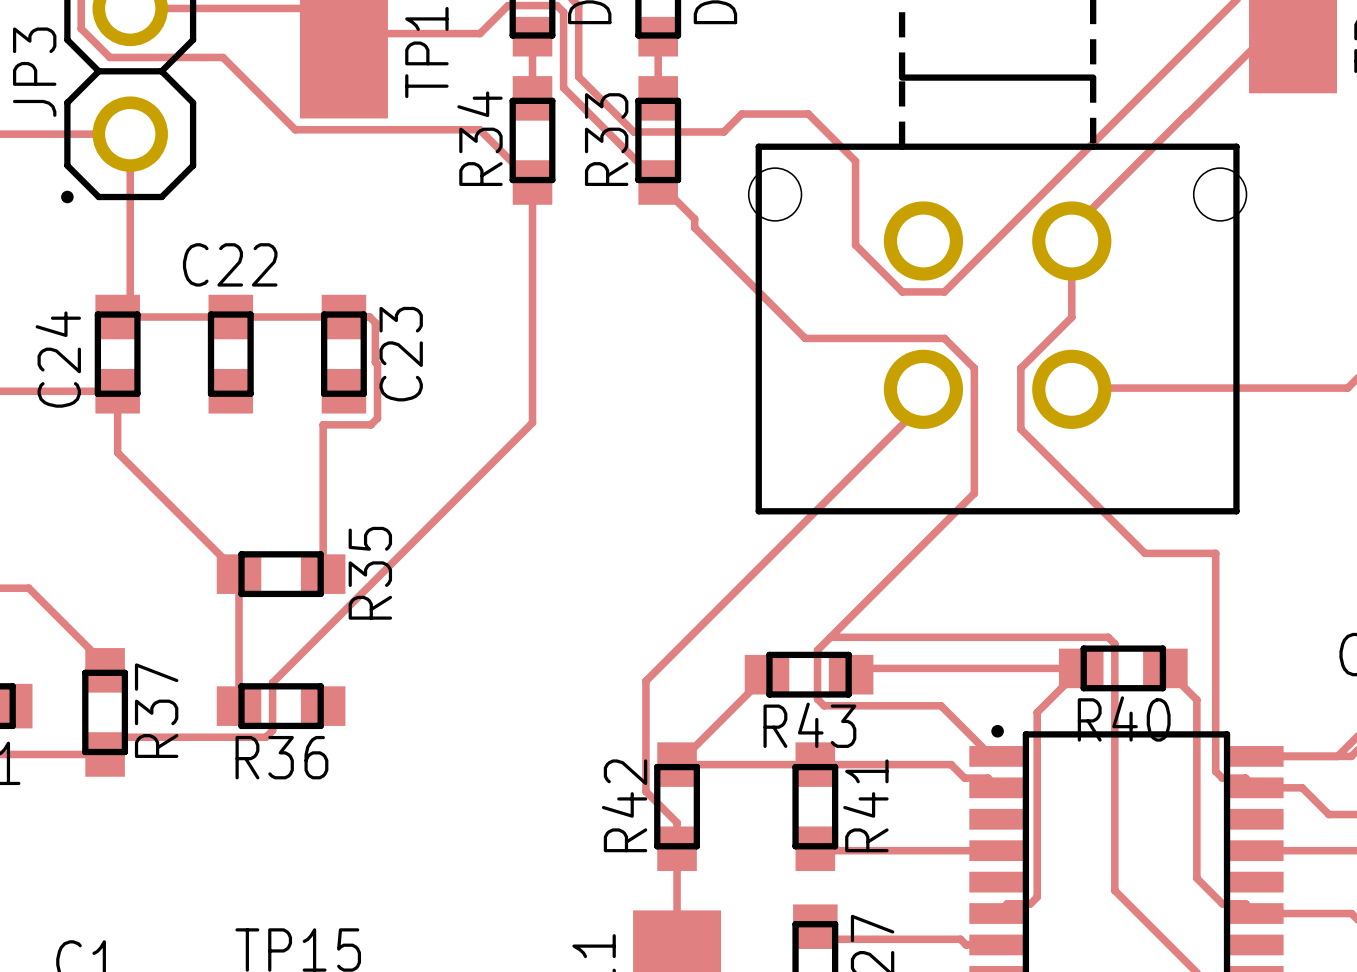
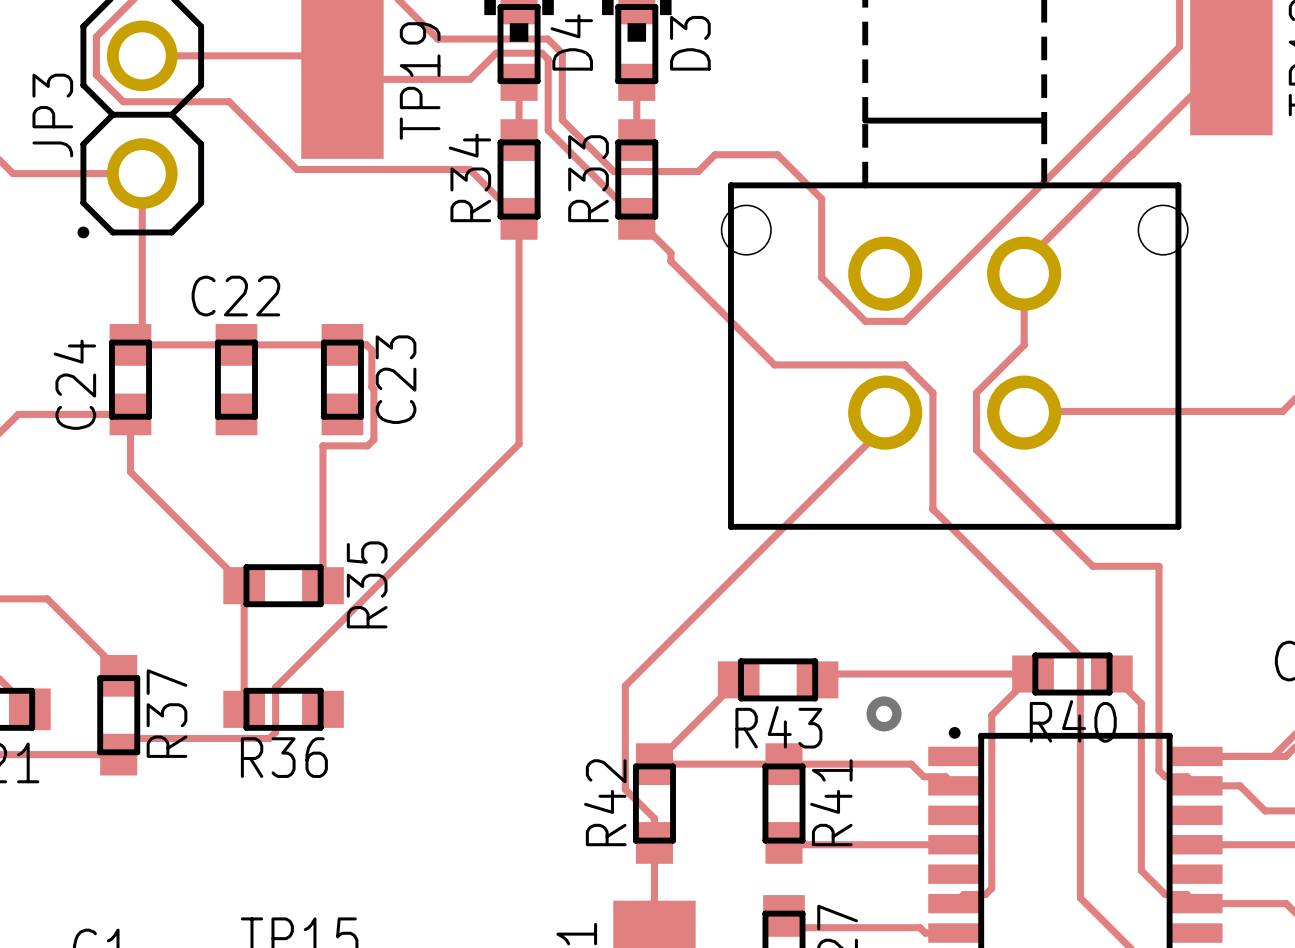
track: (974, 493) (817, 650) (817, 699) (824, 705) (941, 705) (991, 756) (997, 756) -> (932, 509) (1080, 656) (1080, 897)
track: (830, 637) (1108, 637) (1114, 643) (1114, 890) (1131, 907) -> none
via: none -> (884, 713)

